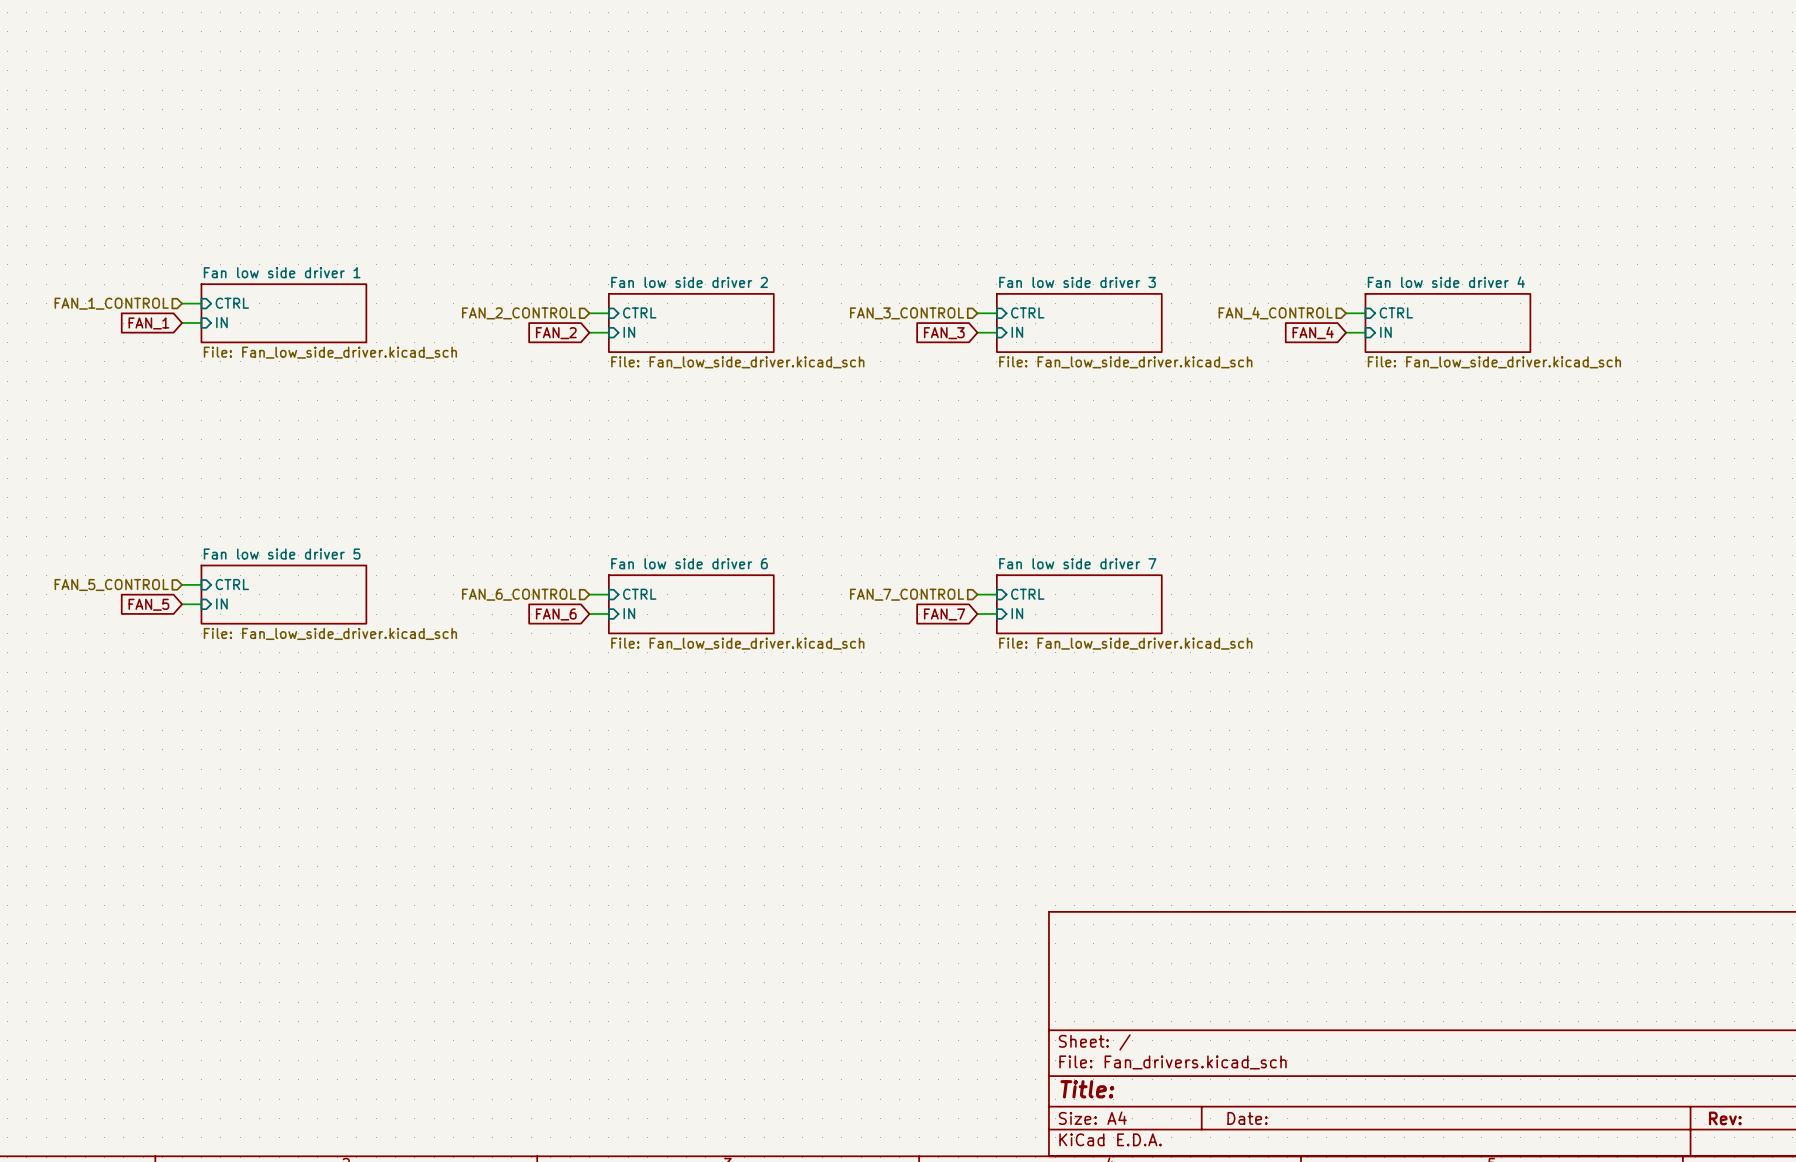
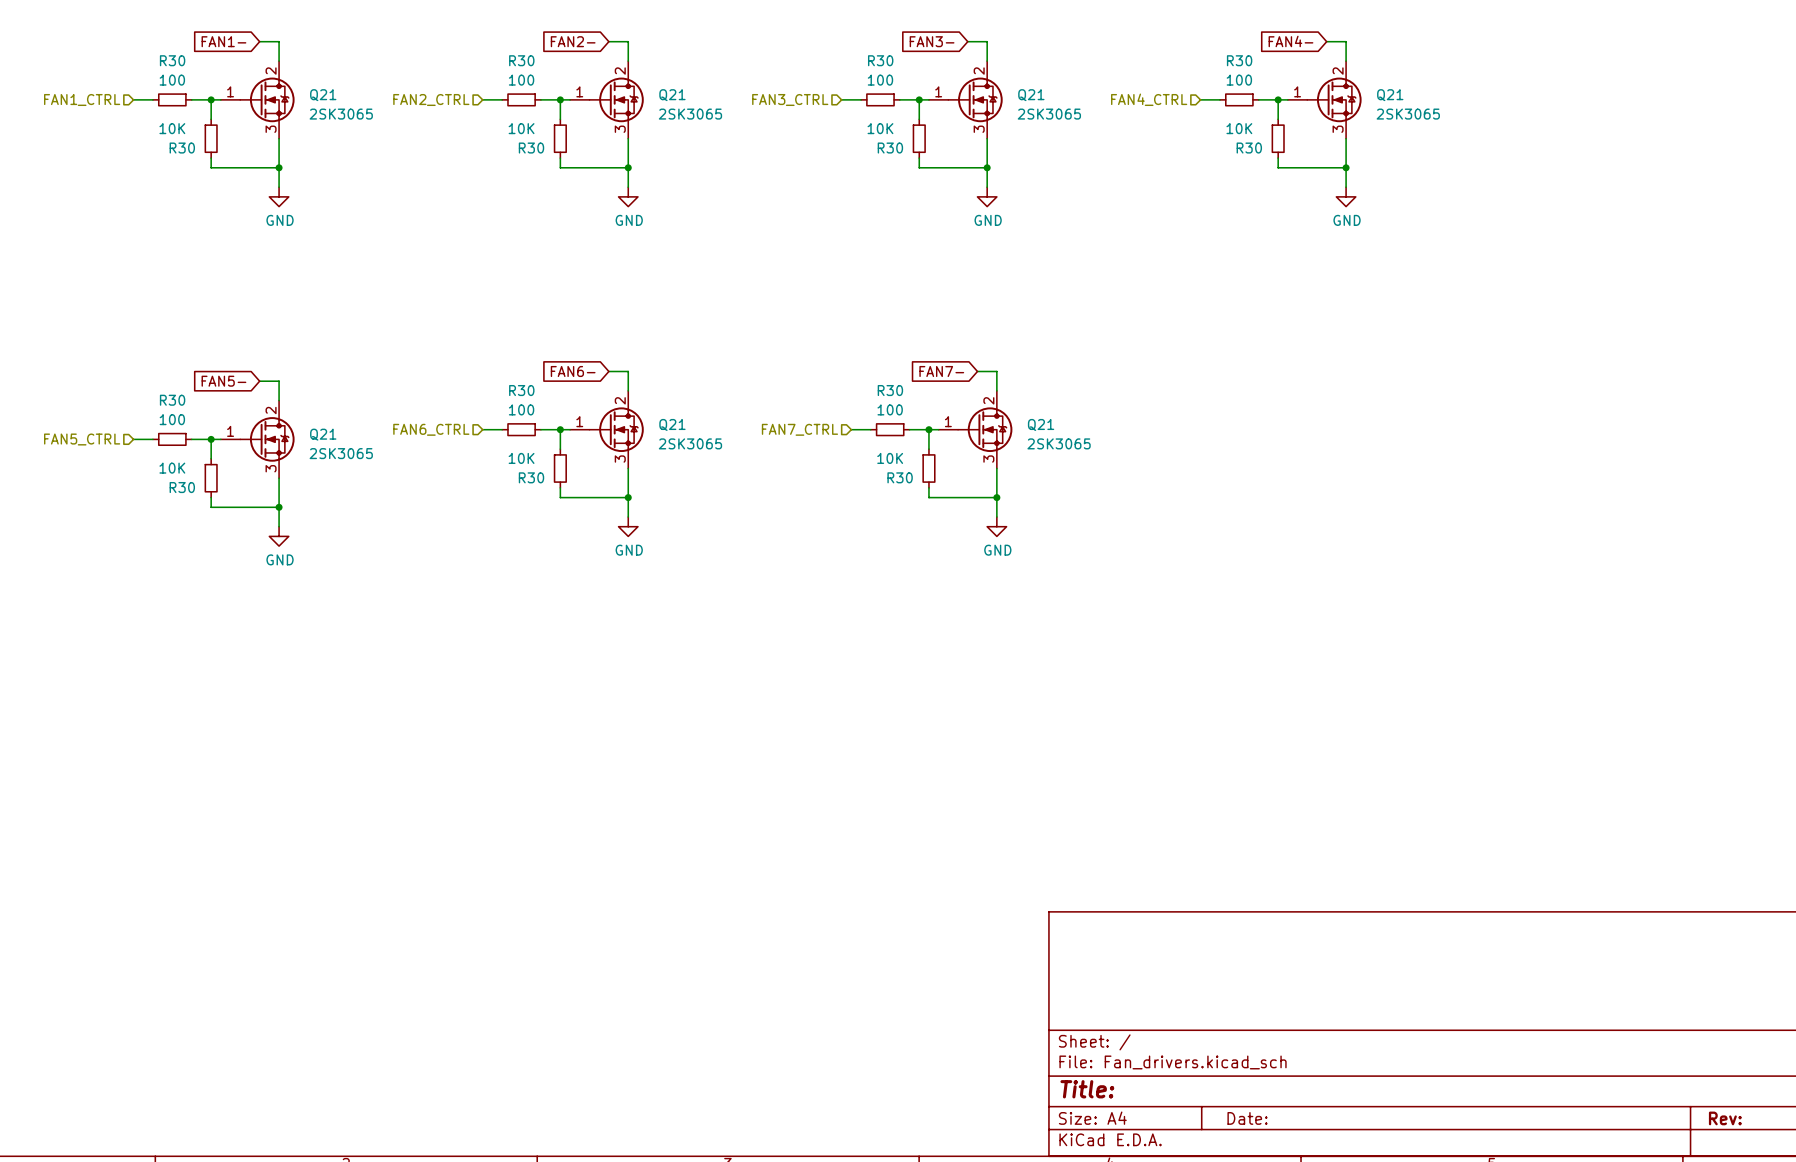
global label: none -> FAN1- (223, 41)
wire: none -> (259, 41) (279, 41) (279, 61)
global label: none -> FAN2- (573, 41)
wire: none -> (608, 41) (628, 41) (628, 61)
global label: none -> FAN3- (932, 41)
wire: none -> (967, 41) (987, 41) (987, 61)
global label: none -> FAN4- (1290, 41)
wire: none -> (1326, 41) (1346, 41) (1346, 61)
hierarchical label: none -> FAN1_CTRL (82, 99)
wire: none -> (133, 99) (152, 99)
R30: none -> 100 (172, 99)
wire: none -> (191, 99) (220, 99)
wire: none -> (211, 99) (211, 119)
junction: none -> (211, 99)
Q21: none -> 2SK3065 (257, 99)
hierarchical label: none -> FAN2_CTRL (431, 99)
wire: none -> (482, 99) (502, 99)
R30: none -> 100 (521, 99)
wire: none -> (540, 99) (570, 99)
wire: none -> (560, 99) (560, 119)
junction: none -> (560, 99)
Q21: none -> 2SK3065 (606, 99)
hierarchical label: none -> FAN3_CTRL (790, 99)
wire: none -> (841, 99) (861, 99)
R30: none -> 100 (880, 99)
wire: none -> (899, 99) (928, 99)
wire: none -> (919, 99) (919, 119)
junction: none -> (919, 99)
Q21: none -> 2SK3065 (965, 99)
hierarchical label: none -> FAN4_CTRL (1149, 99)
wire: none -> (1200, 99) (1219, 99)
R30: none -> 100 (1239, 99)
wire: none -> (1258, 99) (1287, 99)
wire: none -> (1278, 99) (1278, 119)
junction: none -> (1278, 99)
Q21: none -> 2SK3065 (1324, 99)
R30: none -> 10K (211, 138)
wire: none -> (279, 138) (279, 187)
R30: none -> 10K (560, 138)
wire: none -> (628, 138) (628, 187)
R30: none -> 10K (919, 138)
wire: none -> (987, 138) (987, 187)
R30: none -> 10K (1278, 138)
wire: none -> (1346, 138) (1346, 187)
wire: none -> (211, 158) (211, 167) (279, 167)
wire: none -> (560, 158) (560, 167) (628, 167)
wire: none -> (919, 158) (919, 167) (987, 167)
wire: none -> (1278, 158) (1278, 167) (1346, 167)
junction: none -> (279, 167)
junction: none -> (628, 167)
junction: none -> (987, 167)
junction: none -> (1346, 167)
power symbol: none -> GND (279, 196)
power symbol: none -> GND (628, 196)
power symbol: none -> GND (987, 196)
power symbol: none -> GND (1346, 196)
hierarchical label: FAN_1_CONTROL (111, 303) -> none
wire: (182, 303) (201, 303) -> none
sheet pin: CTRL (232, 303) -> none
sheet pin: CTRL (639, 312) -> none
sheet pin: CTRL (1027, 312) -> none
sheet pin: CTRL (1396, 312) -> none
sheet Fan low side driver 1: File: Fan_low_side_driver.kicad_sch (283, 313) -> none
hierarchical label: FAN_2_CONTROL (519, 313) -> none
wire: (589, 313) (608, 313) -> none
hierarchical label: FAN_3_CONTROL (907, 313) -> none
wire: (977, 313) (996, 313) -> none
hierarchical label: FAN_4_CONTROL (1275, 313) -> none
wire: (1346, 313) (1365, 313) -> none
sheet pin: IN (221, 322) -> none
global label: FAN_1 (148, 323) -> none
wire: (182, 323) (201, 323) -> (133, 439) (152, 439)
sheet Fan low side driver 2: File: Fan_low_side_driver.kicad_sch (691, 323) -> none
sheet Fan low side driver 3: File: Fan_low_side_driver.kicad_sch (1079, 323) -> none
sheet Fan low side driver 4: File: Fan_low_side_driver.kicad_sch (1447, 323) -> none
wire: (589, 332) (608, 332) -> (482, 429) (502, 429)
sheet pin: IN (629, 332) -> none
wire: (977, 332) (996, 332) -> (851, 429) (870, 429)
sheet pin: IN (1017, 332) -> none
global label: FAN_4 (1313, 332) -> none
wire: (1346, 332) (1365, 332) -> none
sheet pin: IN (1385, 332) -> none
global label: FAN_2 (556, 333) -> none
global label: FAN_3 (944, 333) -> none
global label: none -> FAN6- (573, 371)
wire: none -> (608, 371) (628, 371) (628, 390)
global label: none -> FAN7- (941, 371)
wire: none -> (977, 371) (996, 371) (996, 390)
global label: none -> FAN5- (223, 381)
wire: none -> (259, 381) (279, 381) (279, 400)
hierarchical label: none -> FAN6_CTRL (431, 429)
R30: none -> 100 (521, 429)
wire: none -> (540, 429) (570, 429)
wire: none -> (560, 429) (560, 449)
junction: none -> (560, 429)
Q21: none -> 2SK3065 (606, 429)
hierarchical label: none -> FAN7_CTRL (799, 429)
R30: none -> 100 (890, 429)
wire: none -> (909, 429) (938, 429)
wire: none -> (928, 429) (928, 449)
junction: none -> (928, 429)
Q21: none -> 2SK3065 (975, 429)
hierarchical label: none -> FAN5_CTRL (82, 439)
R30: none -> 100 (172, 439)
wire: none -> (191, 439) (220, 439)
wire: none -> (211, 439) (211, 458)
junction: none -> (211, 439)
Q21: none -> 2SK3065 (257, 439)
R30: none -> 10K (560, 468)
wire: none -> (628, 468) (628, 517)
R30: none -> 10K (928, 468)
wire: none -> (996, 468) (996, 517)
R30: none -> 10K (211, 478)
wire: none -> (279, 478) (279, 526)
wire: none -> (560, 487) (560, 497) (628, 497)
wire: none -> (928, 487) (928, 497) (996, 497)
wire: none -> (211, 497) (211, 507) (279, 507)
junction: none -> (628, 497)
junction: none -> (996, 497)
junction: none -> (279, 507)
power symbol: none -> GND (628, 526)
power symbol: none -> GND (996, 526)
power symbol: none -> GND (279, 536)
wire: (182, 584) (201, 584) -> none
sheet pin: CTRL (232, 584) -> none
hierarchical label: FAN_5_CONTROL (111, 585) -> none
sheet Fan low side driver 5: File: Fan_low_side_driver.kicad_sch (283, 594) -> none
hierarchical label: FAN_6_CONTROL (519, 594) -> none
wire: (589, 594) (608, 594) -> none
sheet pin: CTRL (639, 594) -> none
hierarchical label: FAN_7_CONTROL (907, 594) -> none
wire: (977, 594) (996, 594) -> none
sheet pin: CTRL (1027, 594) -> none
sheet pin: IN (221, 603) -> none
global label: FAN_5 (148, 604) -> none
wire: (182, 604) (201, 604) -> none
sheet Fan low side driver 6: File: Fan_low_side_driver.kicad_sch (691, 604) -> none
sheet Fan low side driver 7: File: Fan_low_side_driver.kicad_sch (1079, 604) -> none
sheet pin: IN (629, 613) -> none
sheet pin: IN (1017, 613) -> none
global label: FAN_6 (556, 614) -> none
wire: (589, 614) (608, 614) -> none
global label: FAN_7 (944, 614) -> none
wire: (977, 614) (996, 614) -> none

